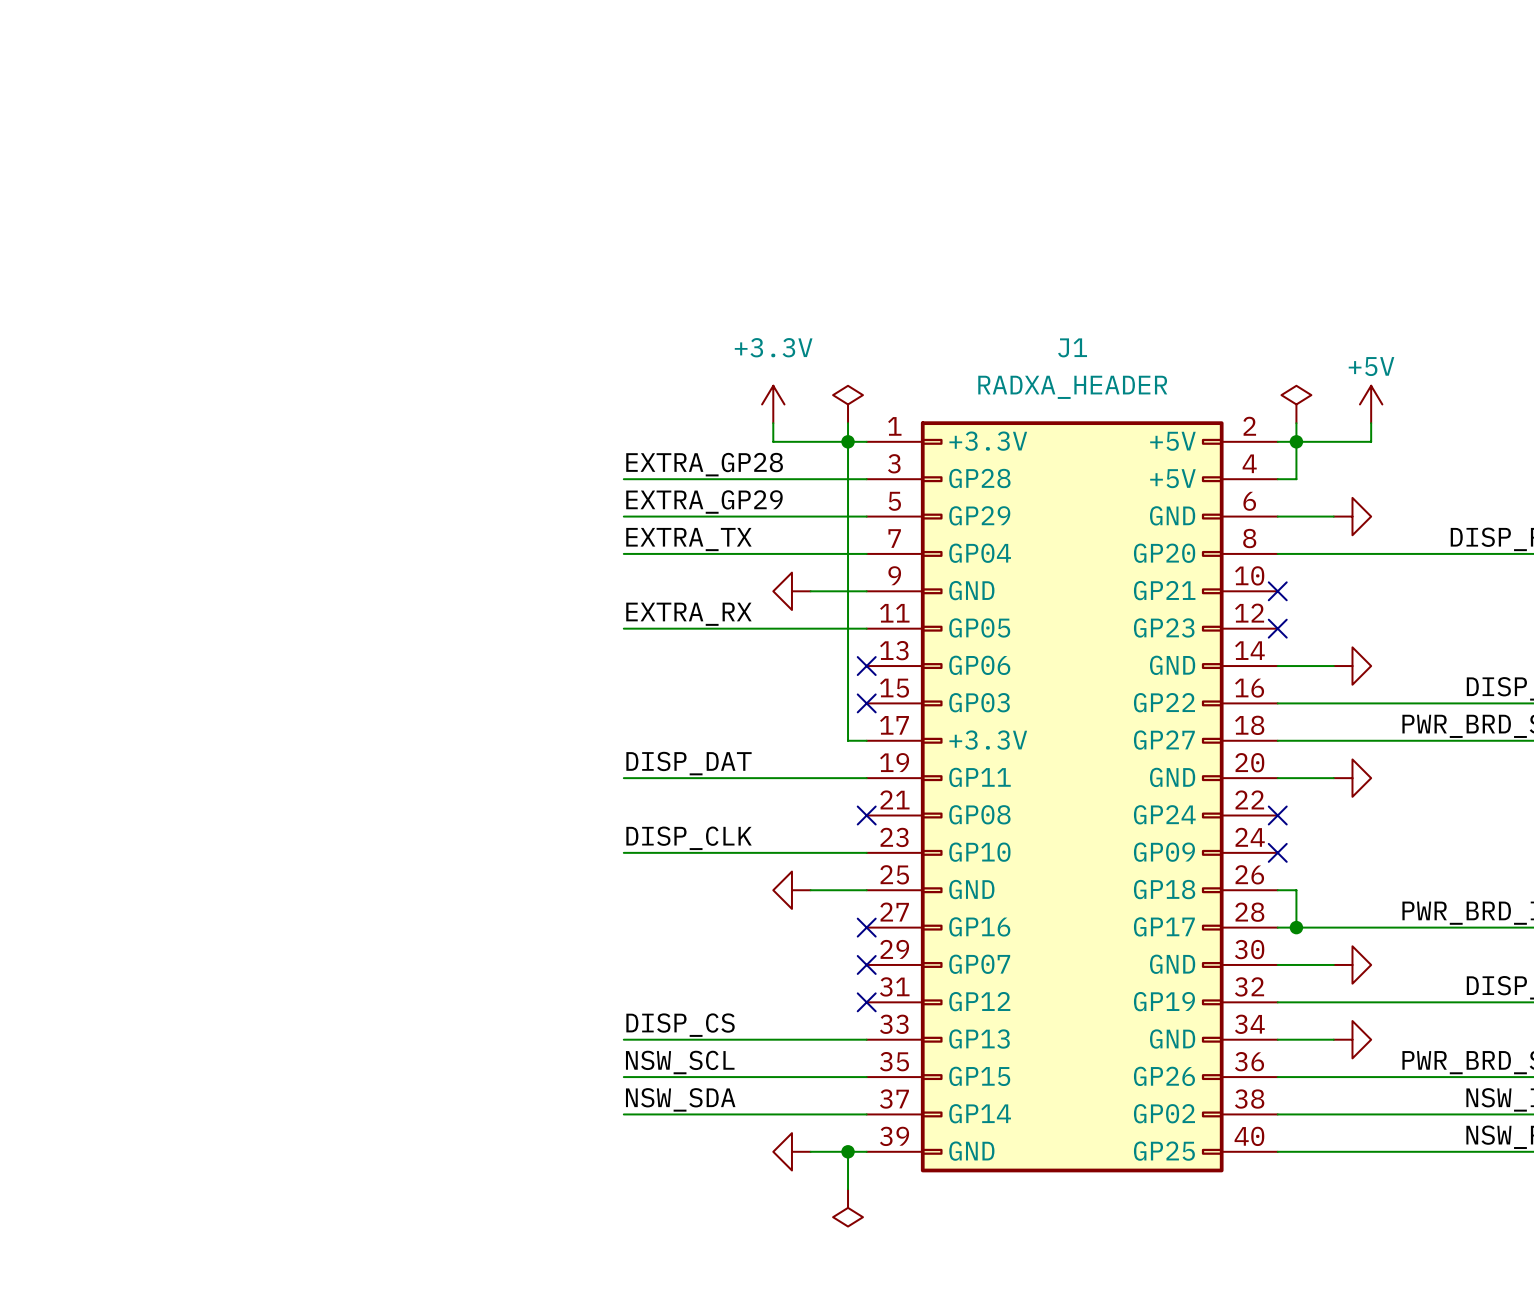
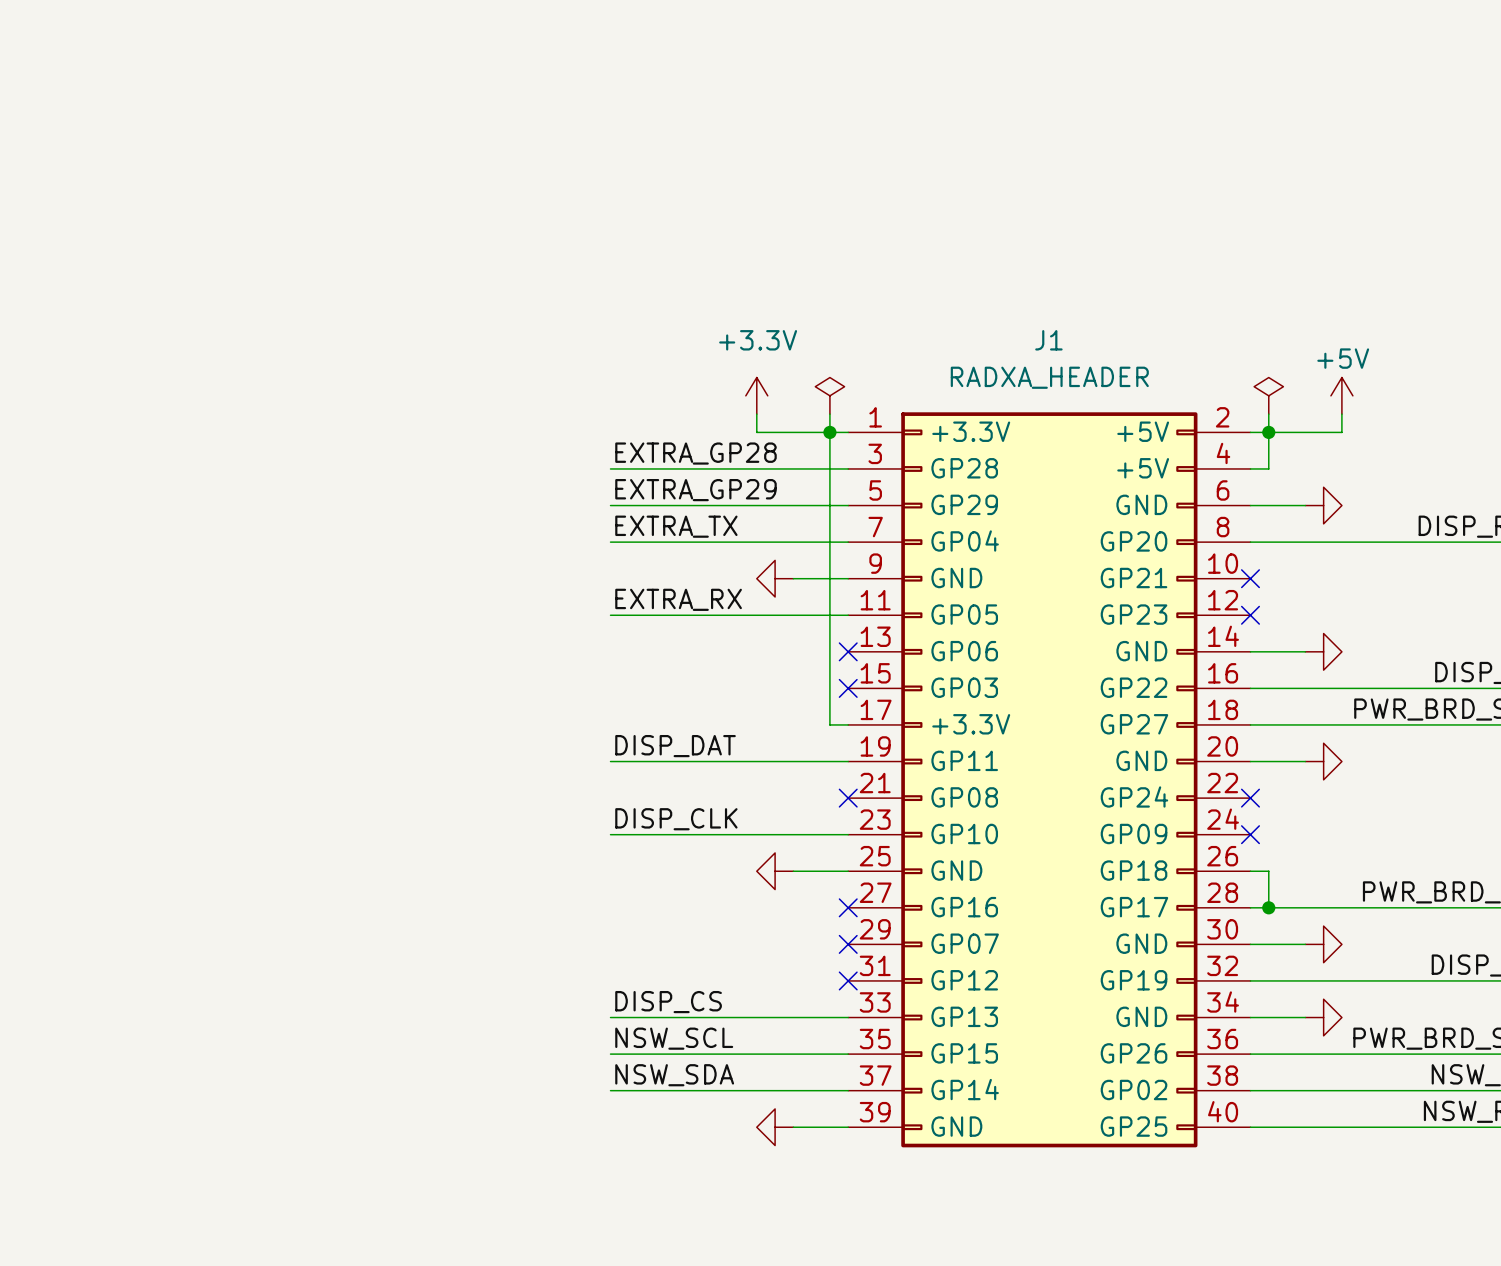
wire: (848, 1151) (848, 1189) -> none
junction: (848, 1151) -> none
power symbol: (848, 1207) -> none

